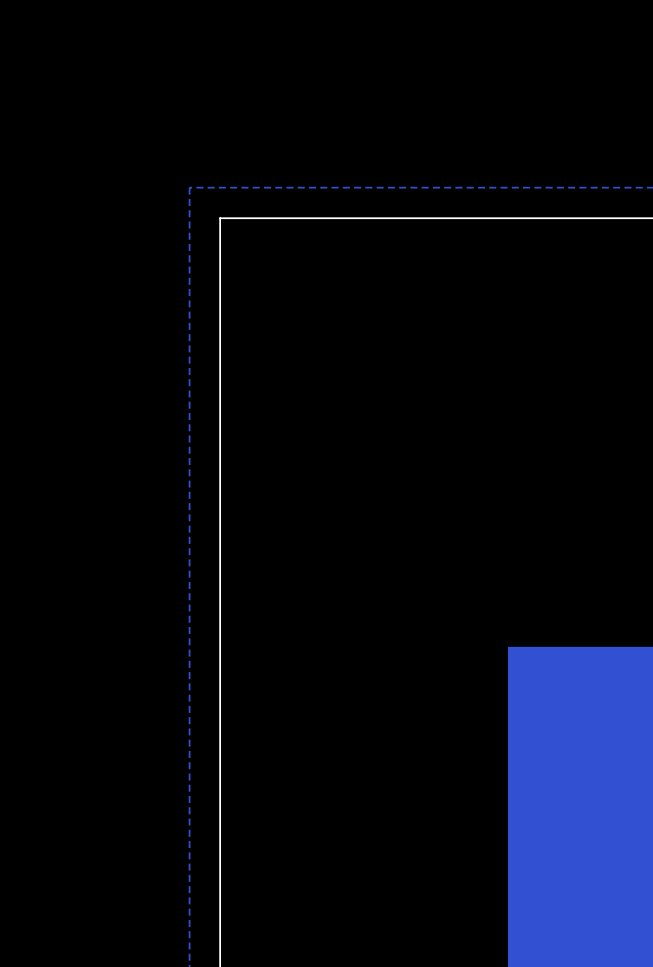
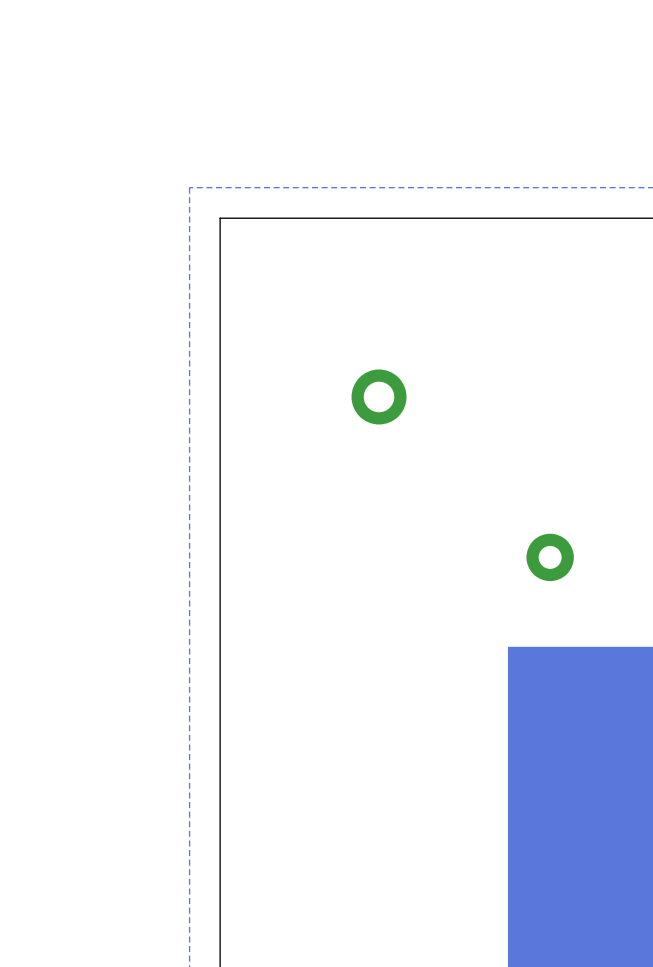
via: none -> (379, 396)
via: none -> (550, 557)

